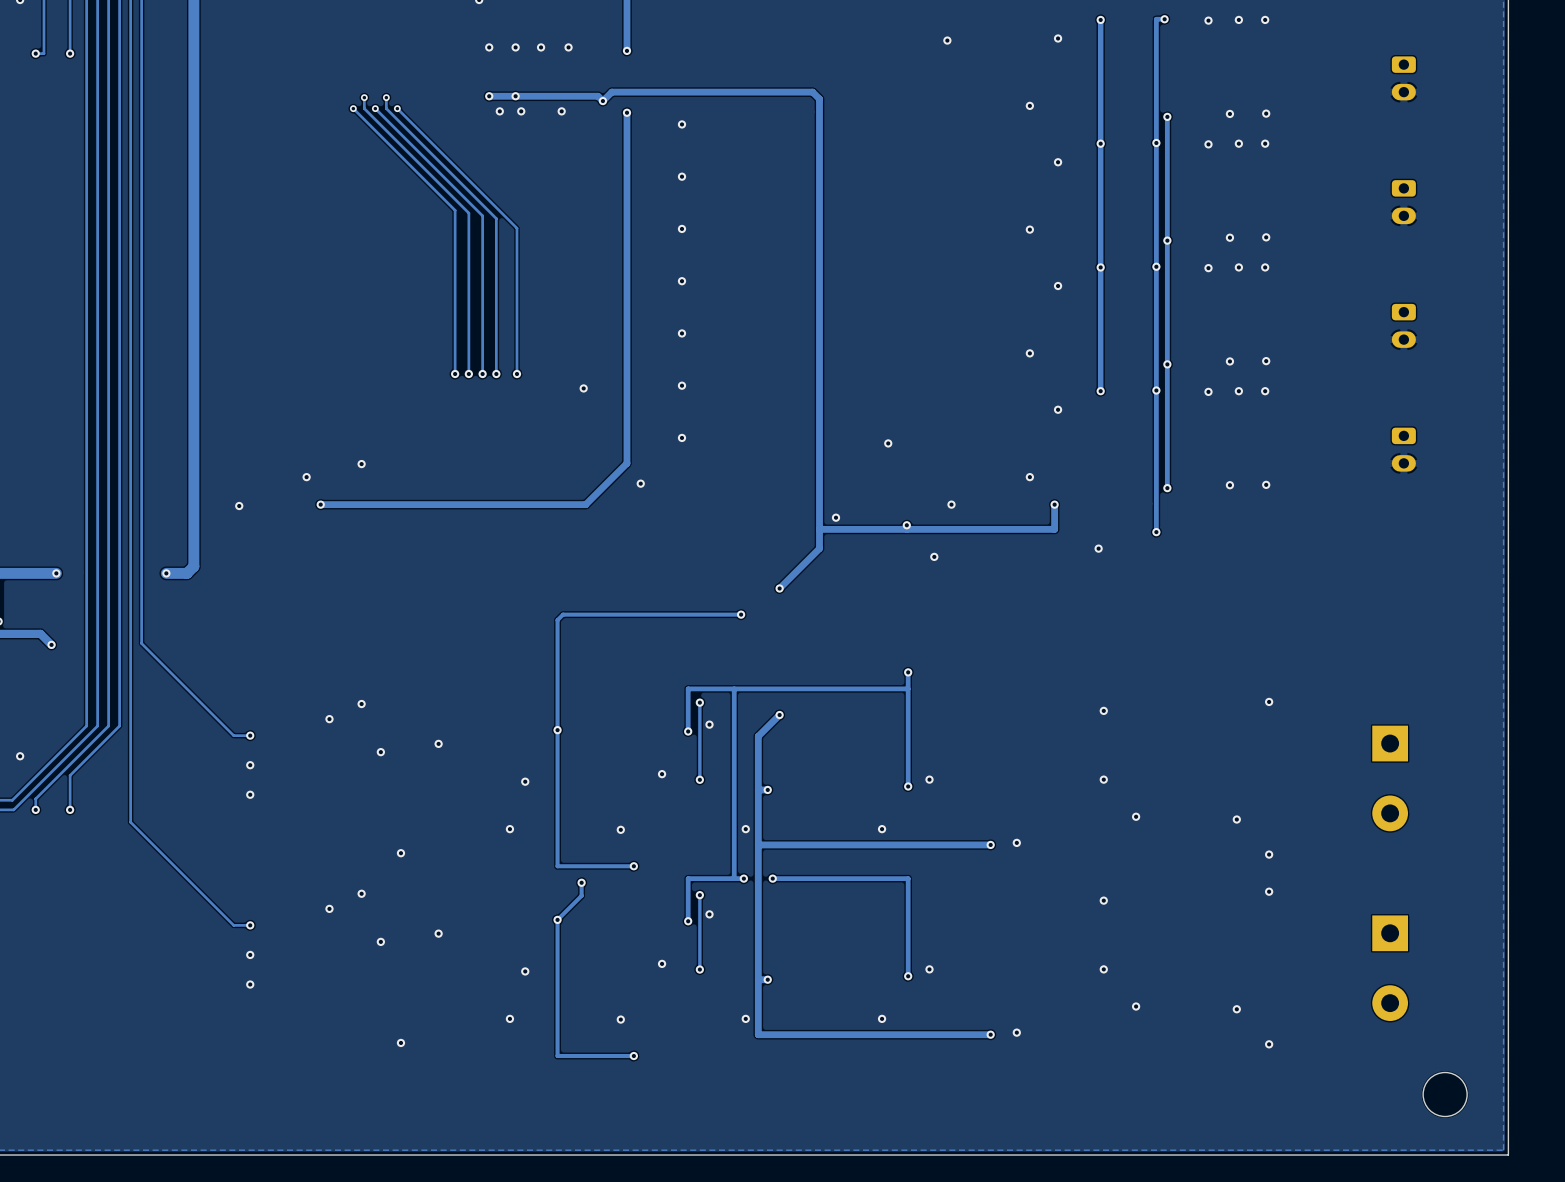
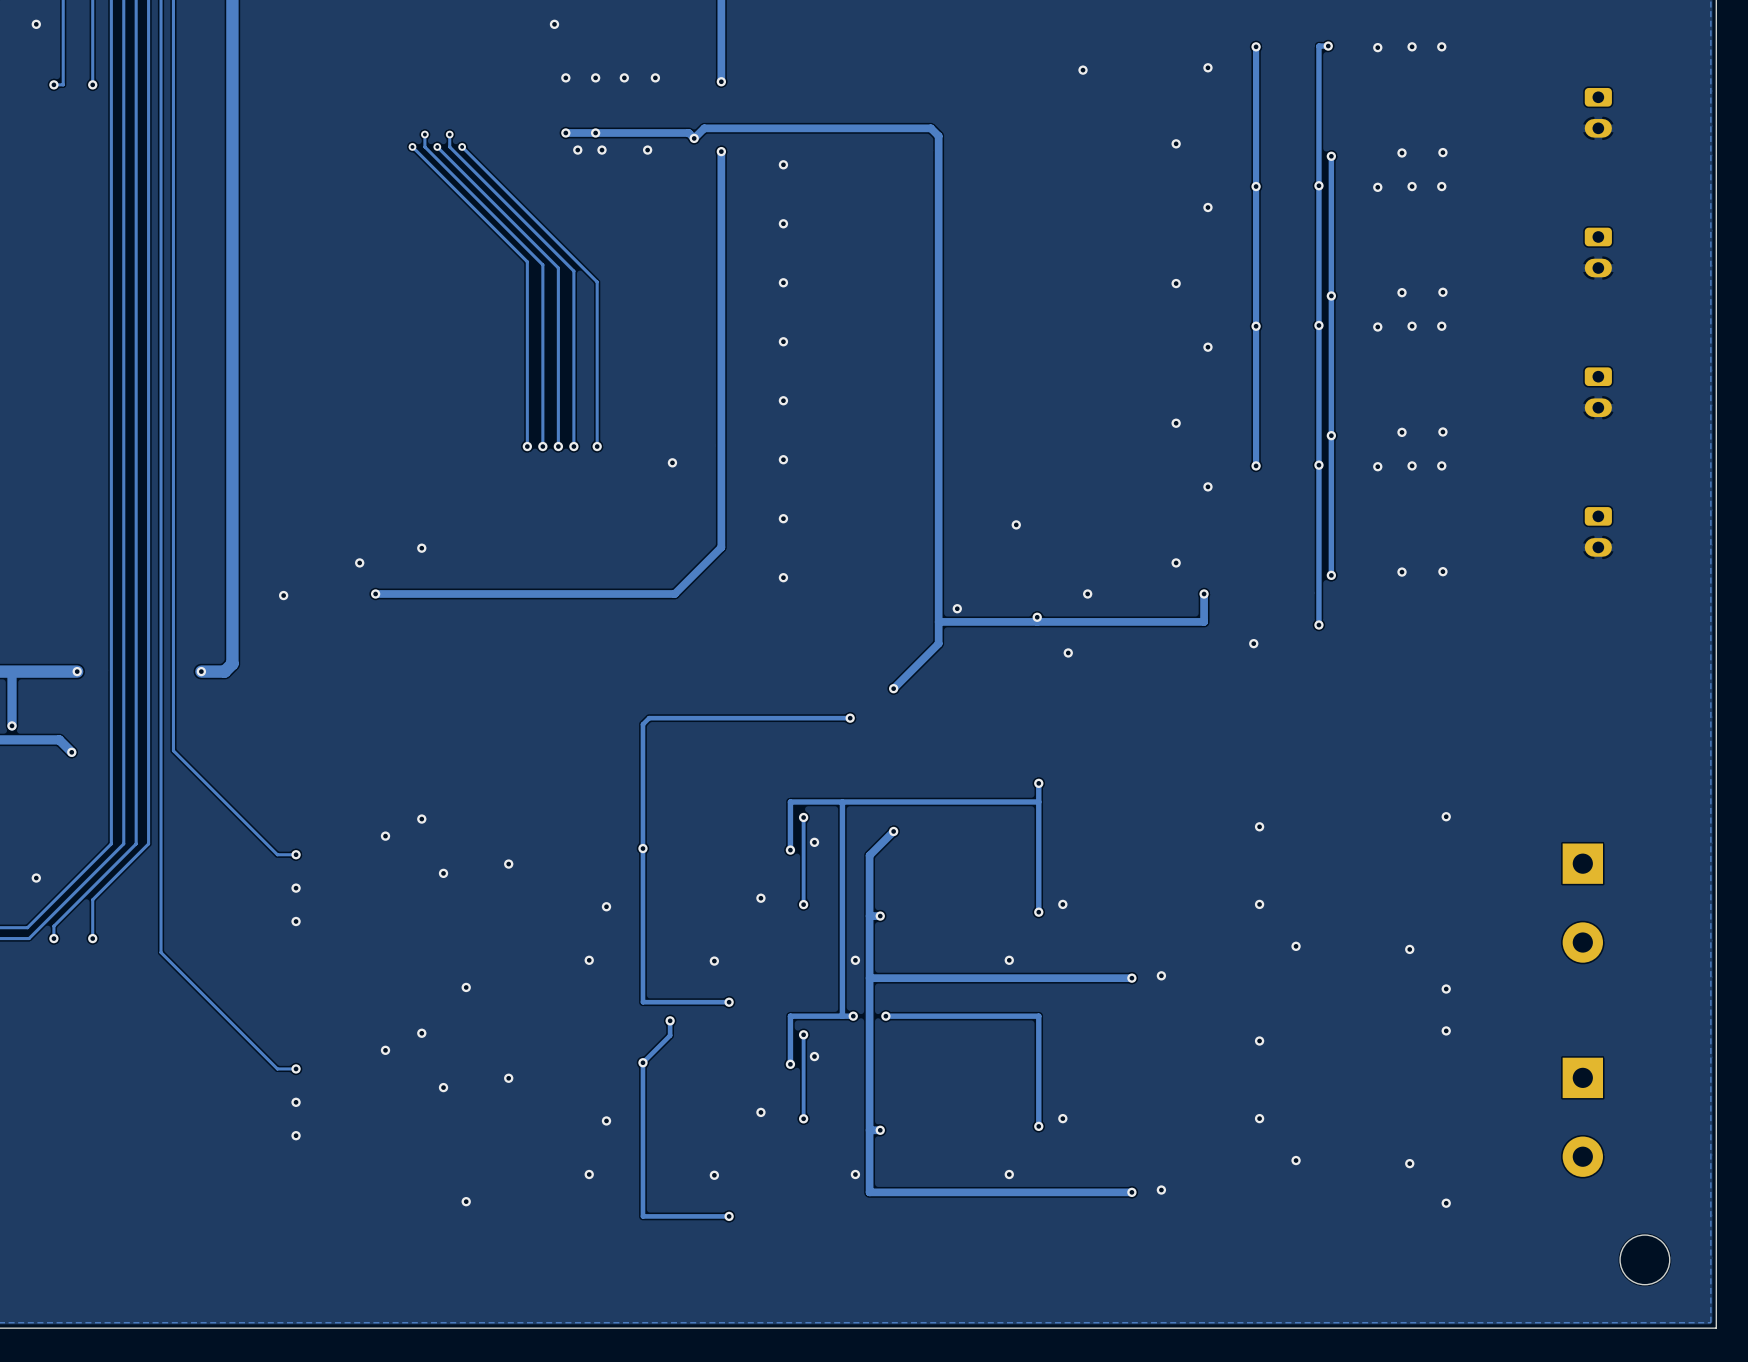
via position: (640, 483) -> (783, 577)

